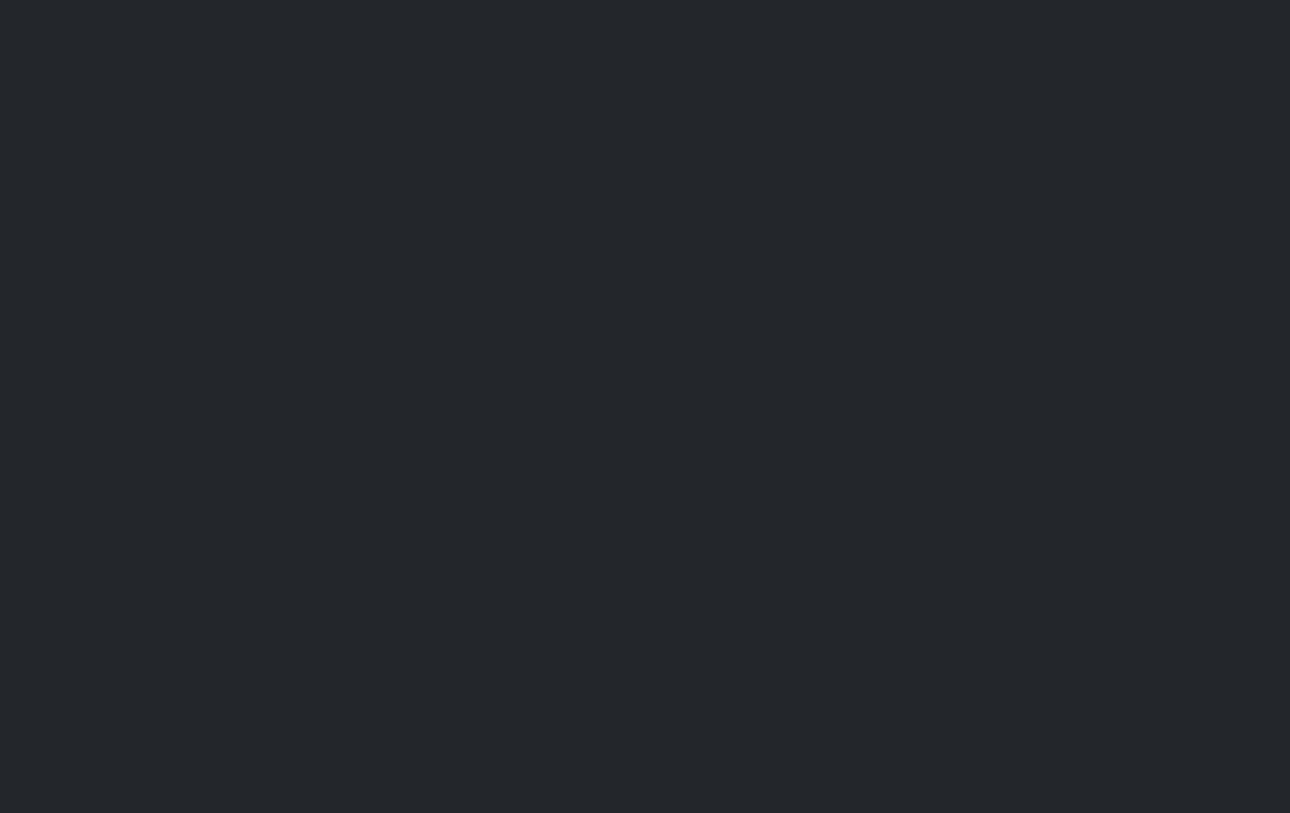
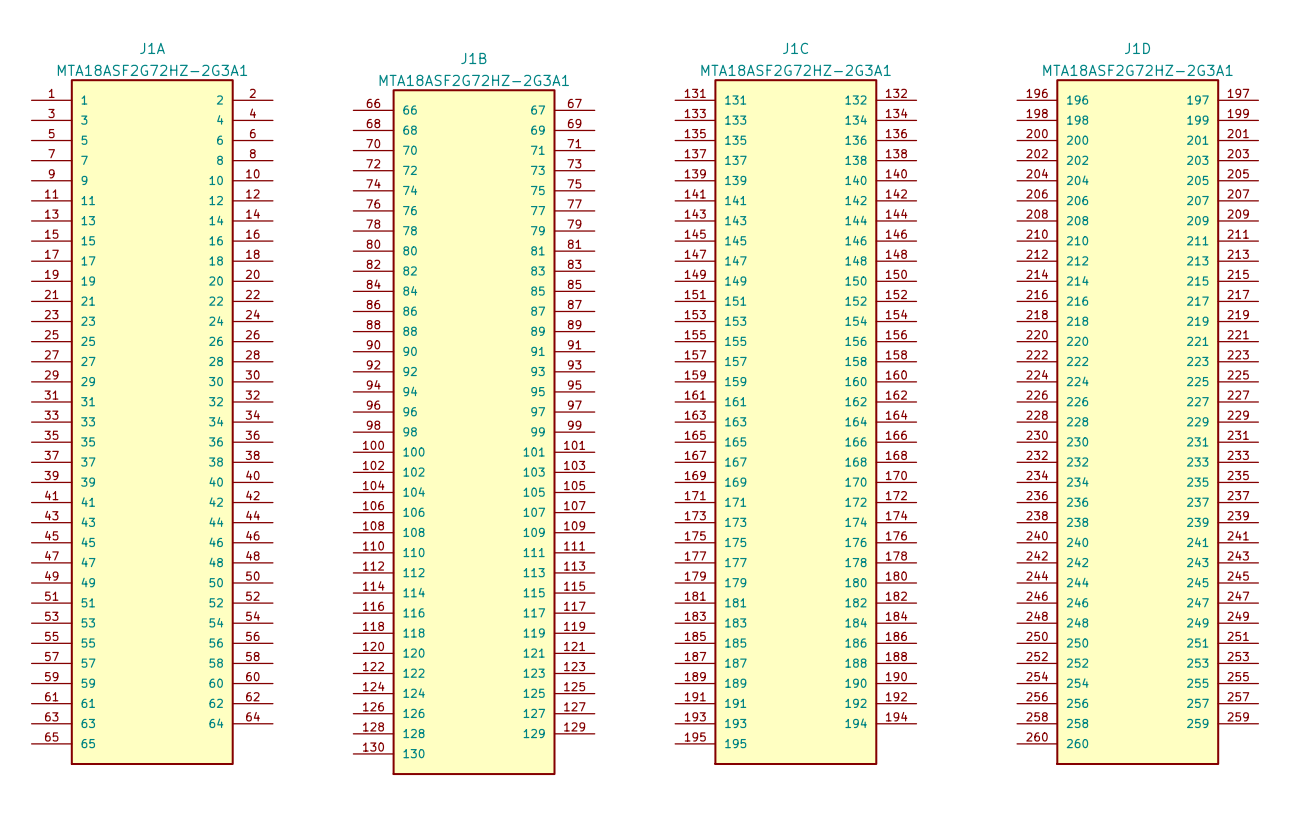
J1A: none -> MTA18ASF2G72HZ-2G3A1 (152, 422)
J1C: none -> MTA18ASF2G72HZ-2G3A1 (795, 422)
J1D: none -> MTA18ASF2G72HZ-2G3A1 (1137, 422)
J1B: none -> MTA18ASF2G72HZ-2G3A1 (474, 432)

